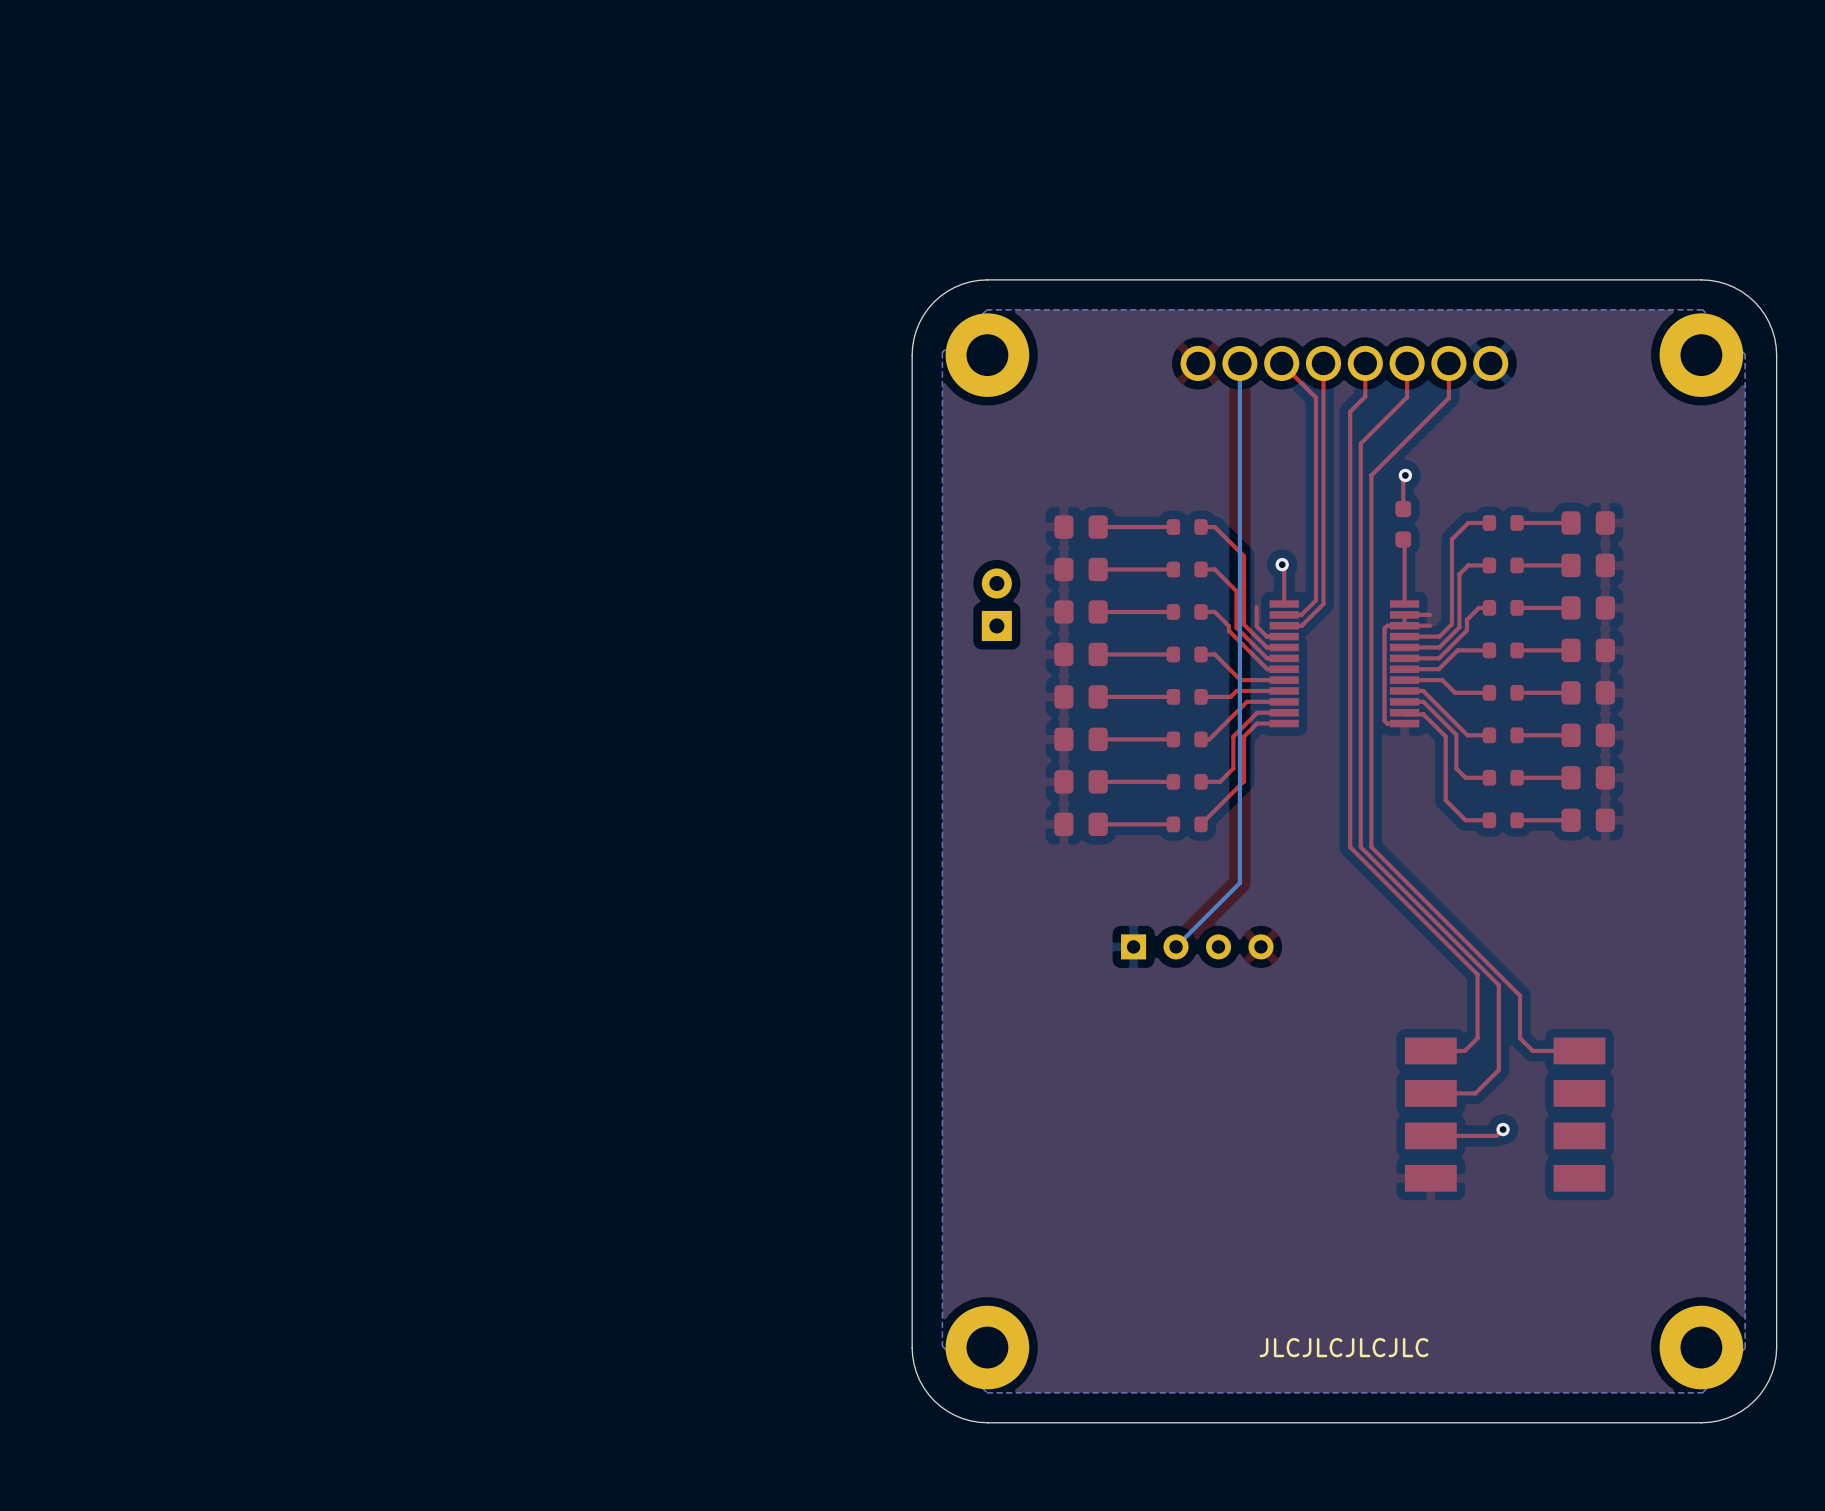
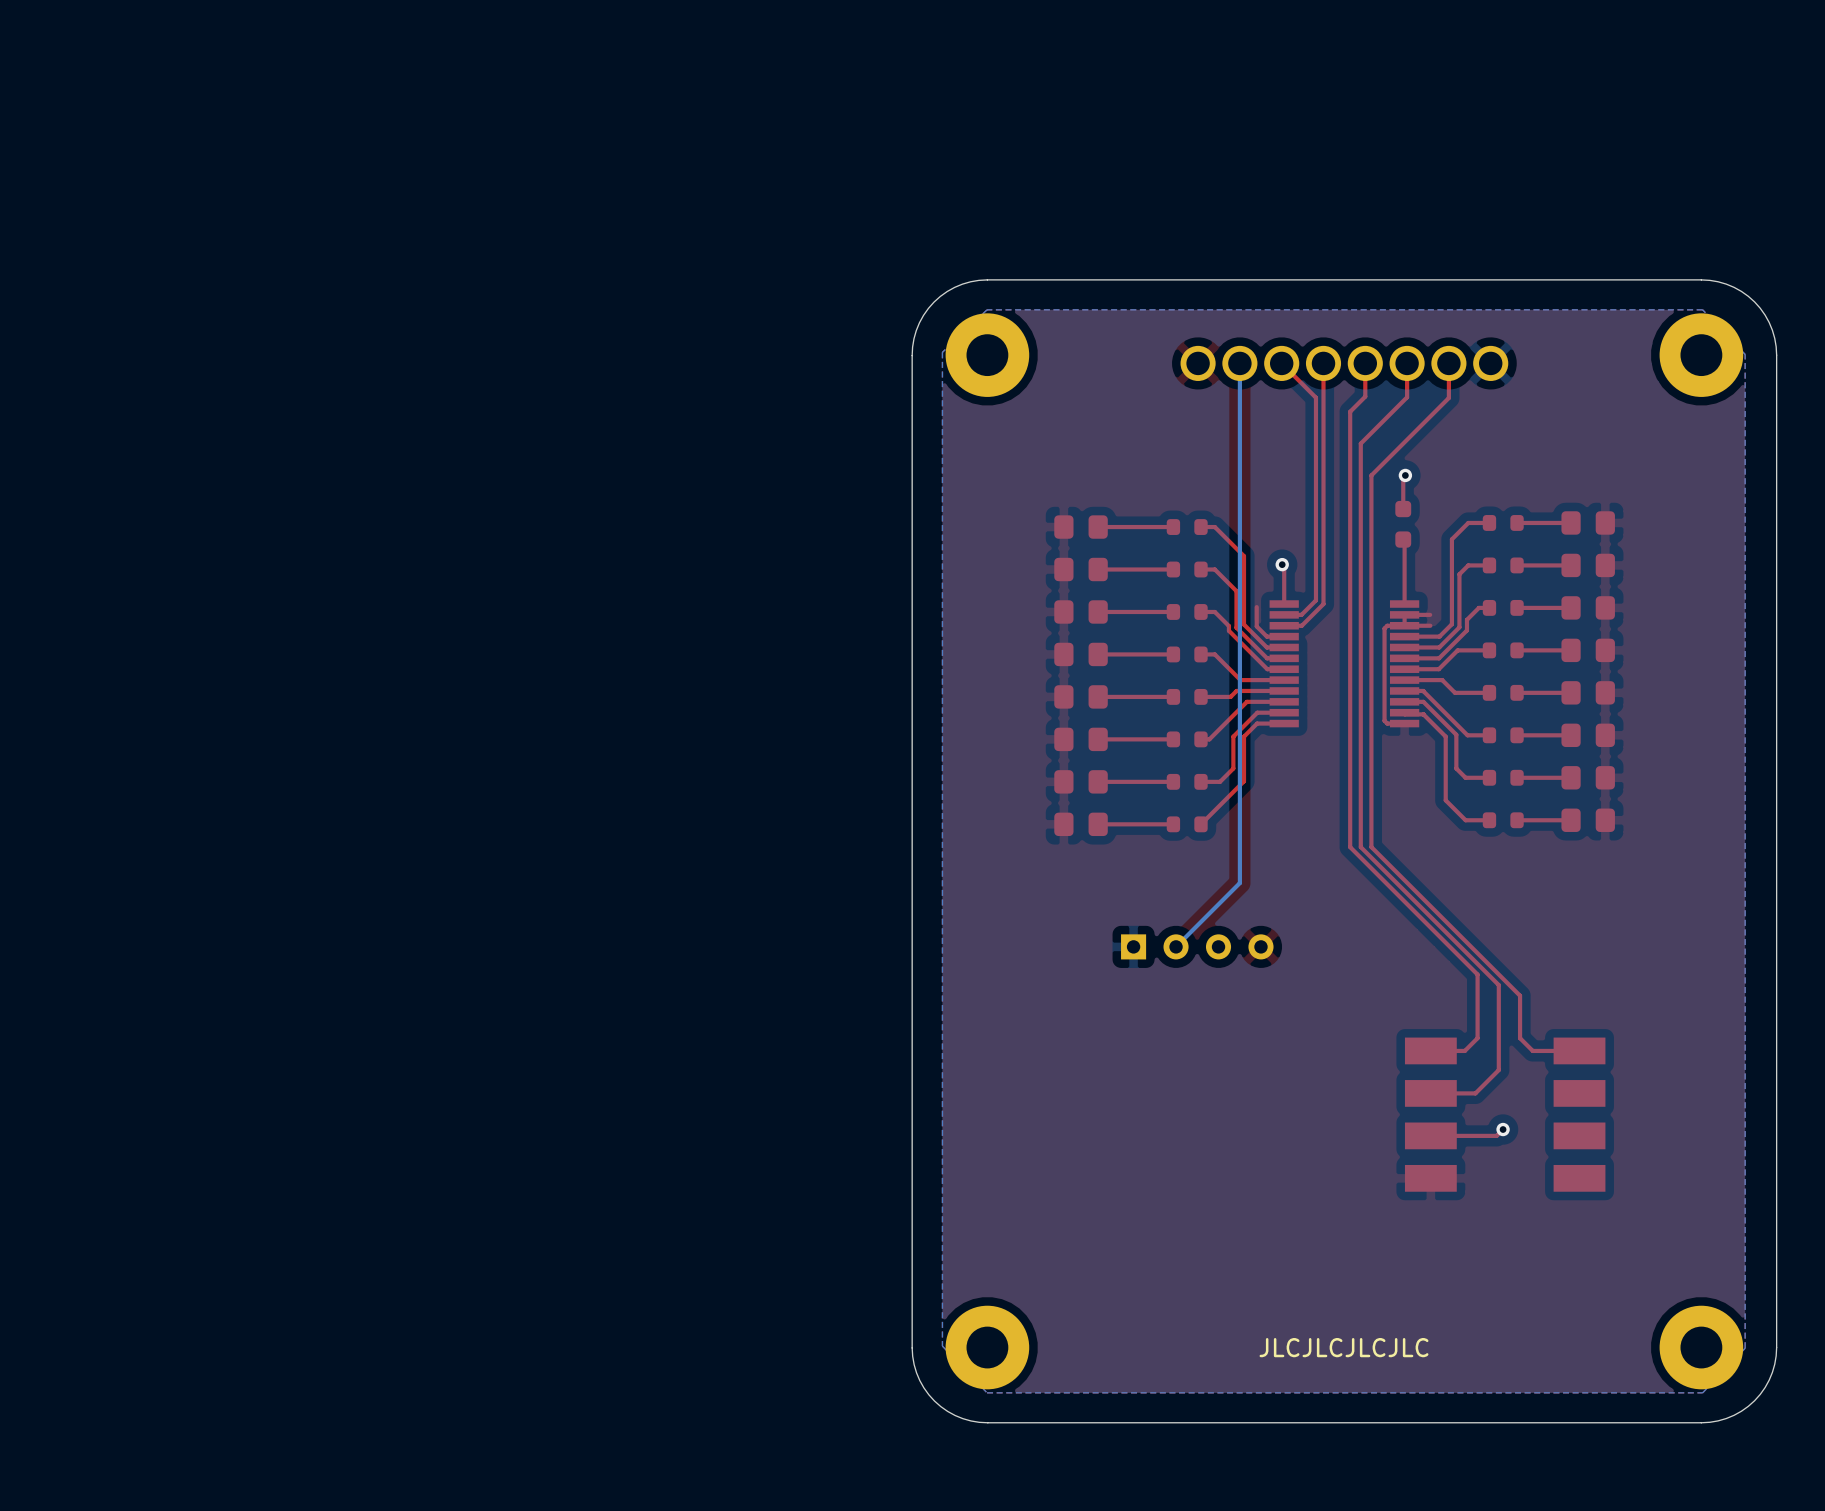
part: (996, 604) -> none

